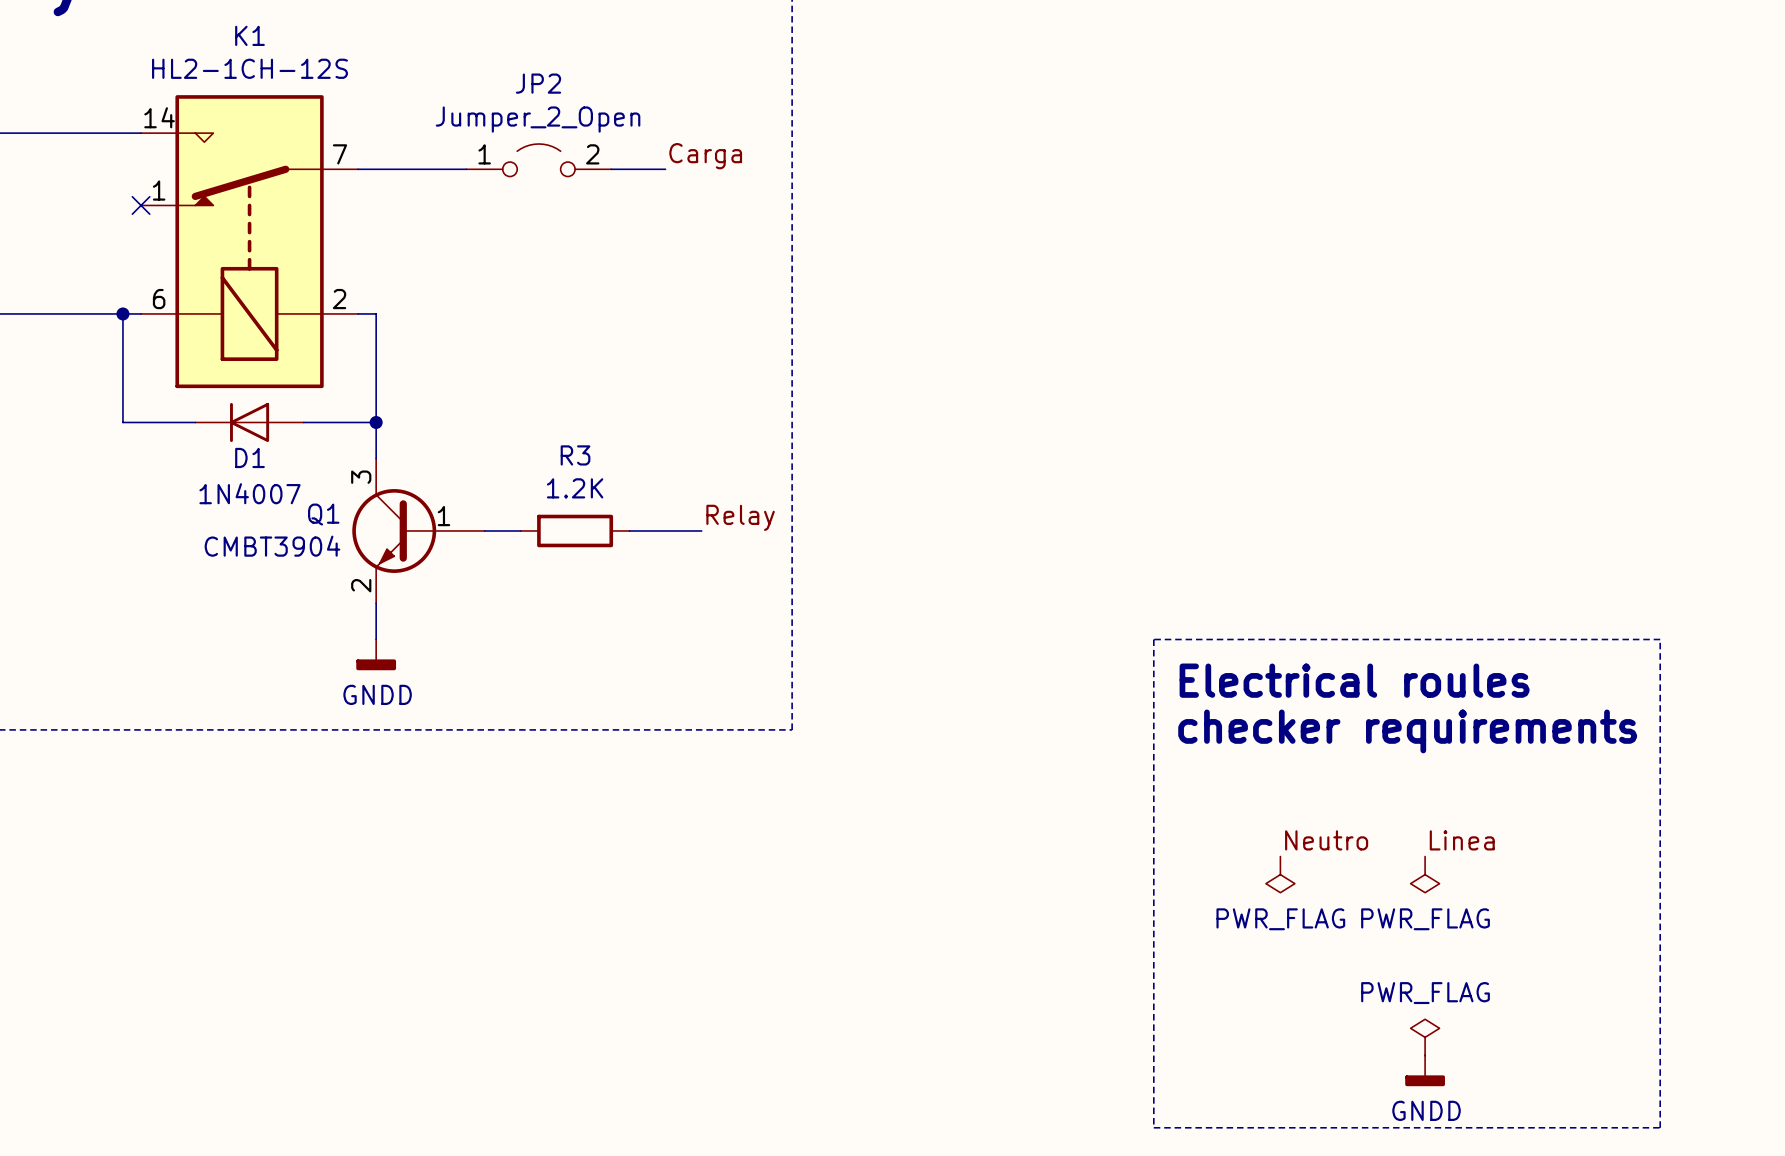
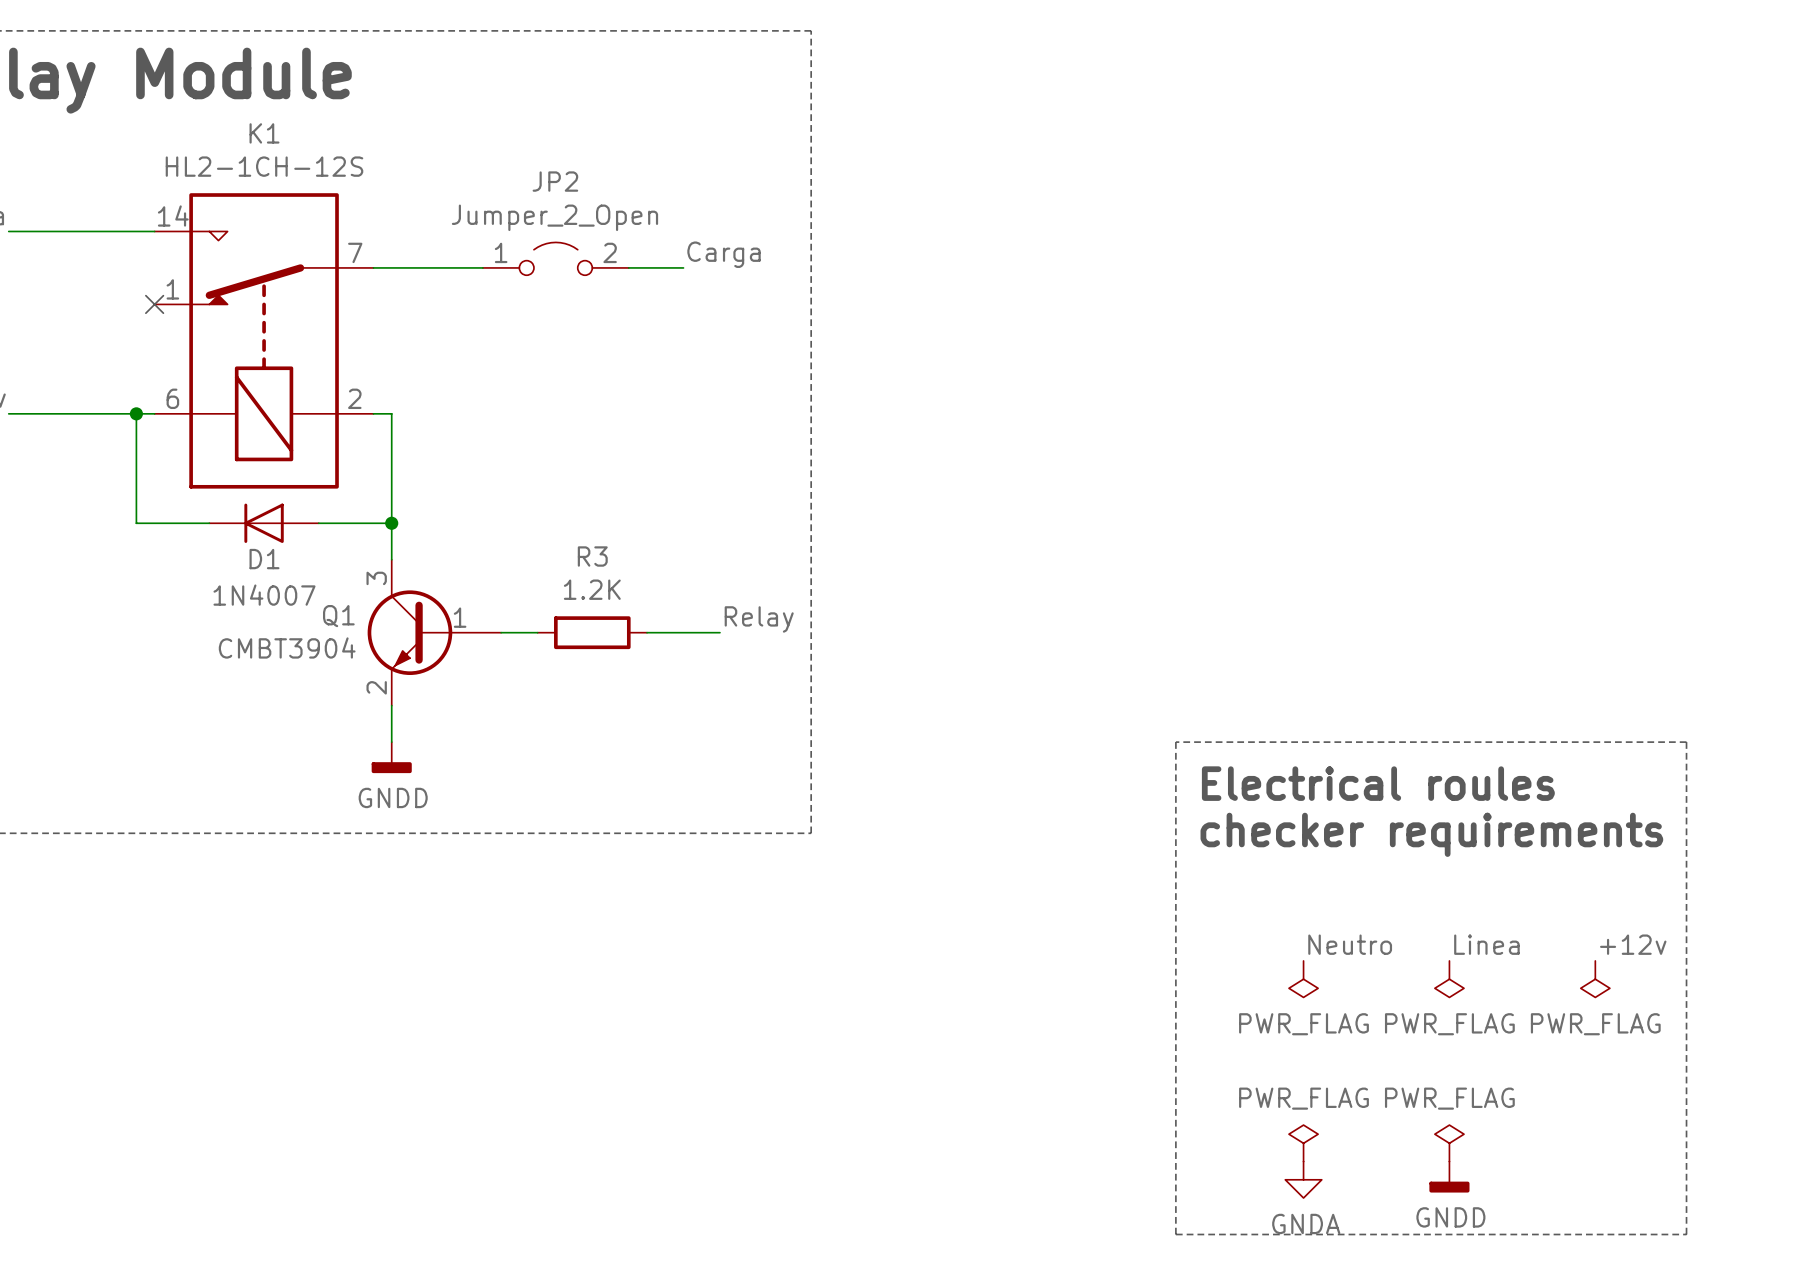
label: none -> +12v (1633, 944)
power symbol: none -> PWR_FLAG (1595, 979)
power symbol: none -> PWR_FLAG (1303, 1143)
power symbol: none -> GNDA (1303, 1179)

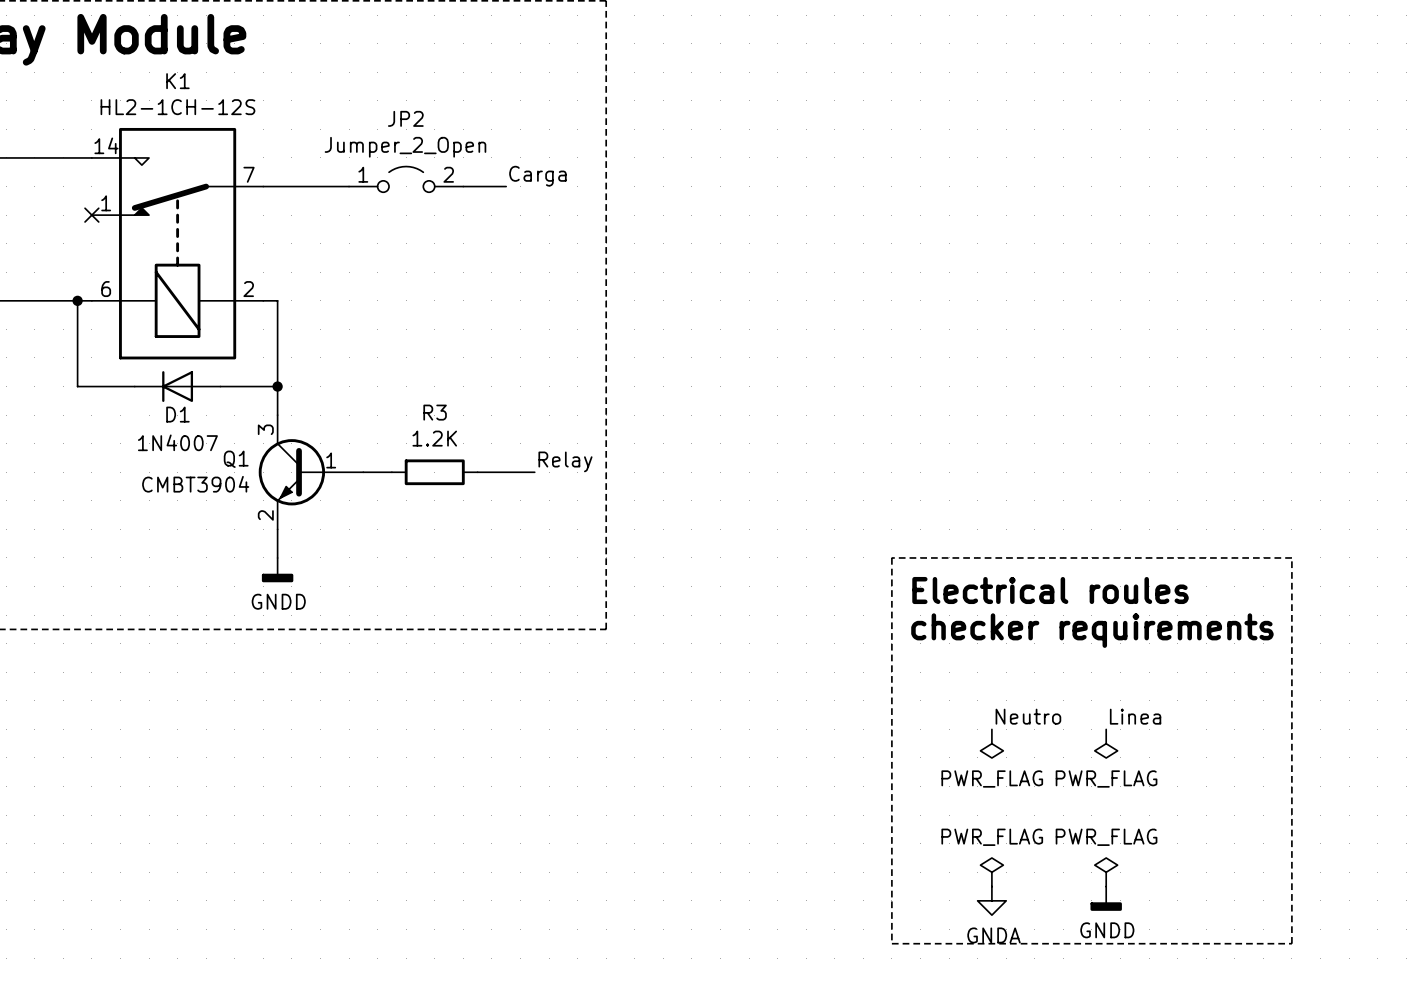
label: +12v (1633, 944) -> none
power symbol: PWR_FLAG (1595, 979) -> none

